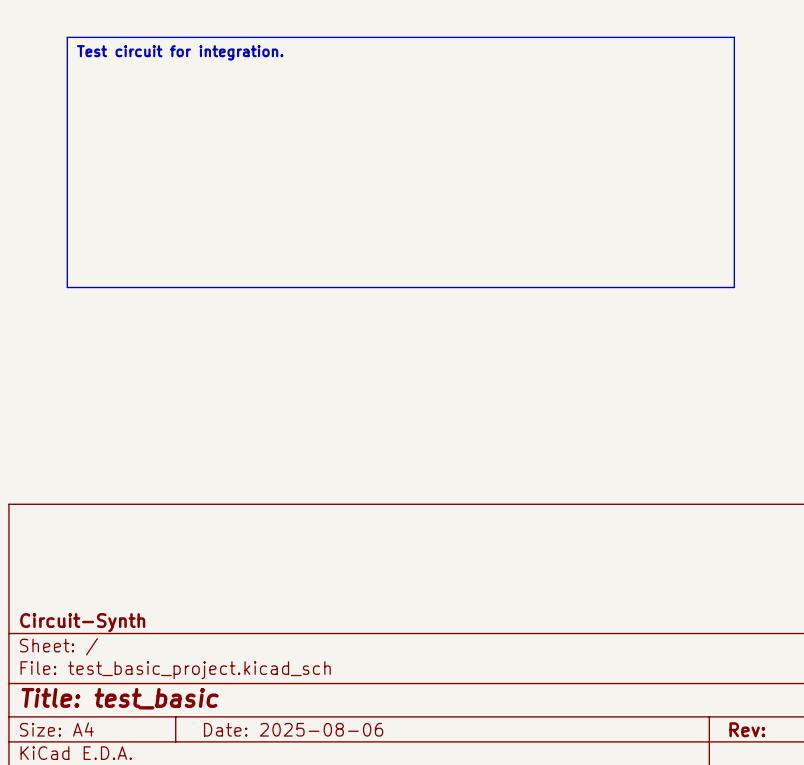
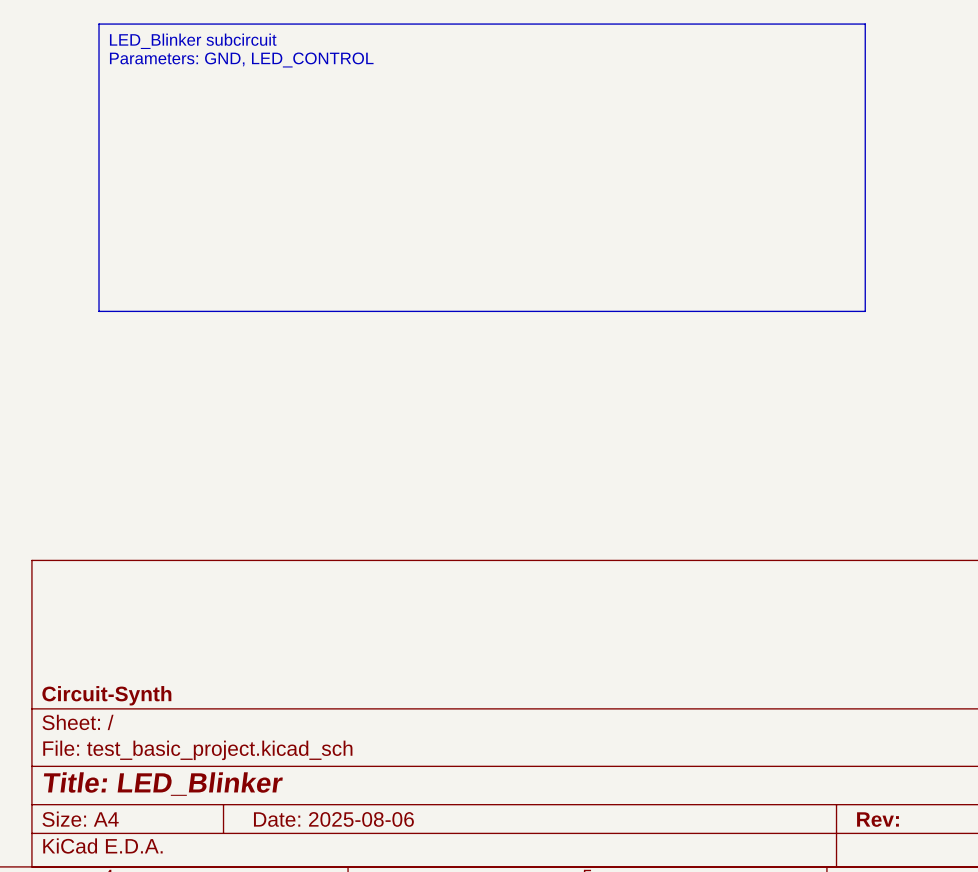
text: Test circuit for integration. (180, 52) -> LED_Blinker subcircuit (193, 41)
text: none -> Parameters: GND, LED_CONTROL (241, 60)
title block: Title: test_basic (120, 698) -> Title: LED_Blinker (163, 784)

